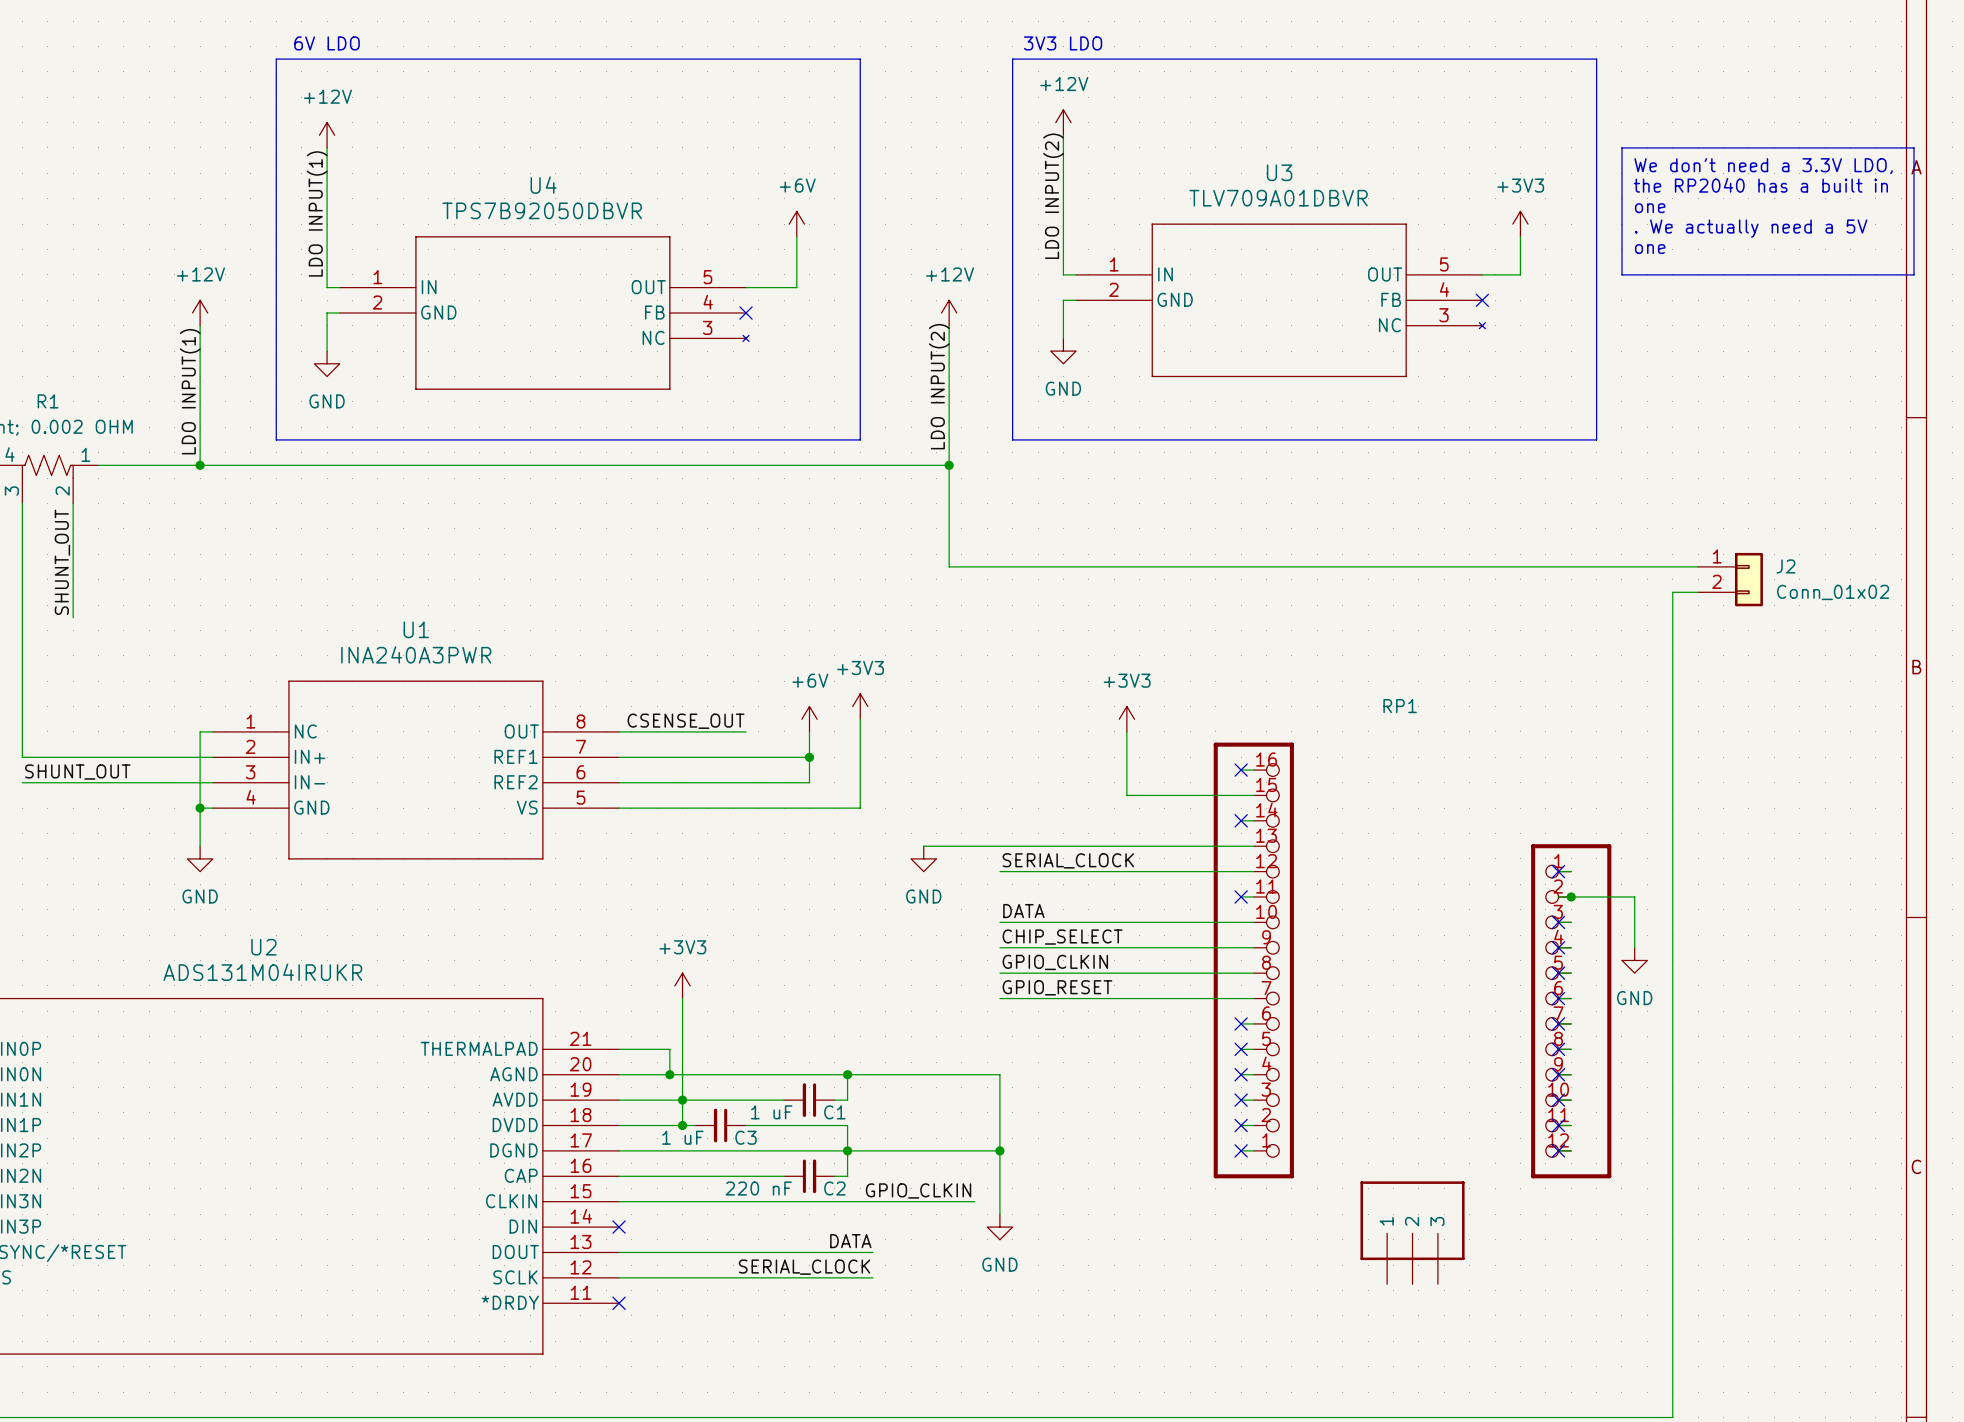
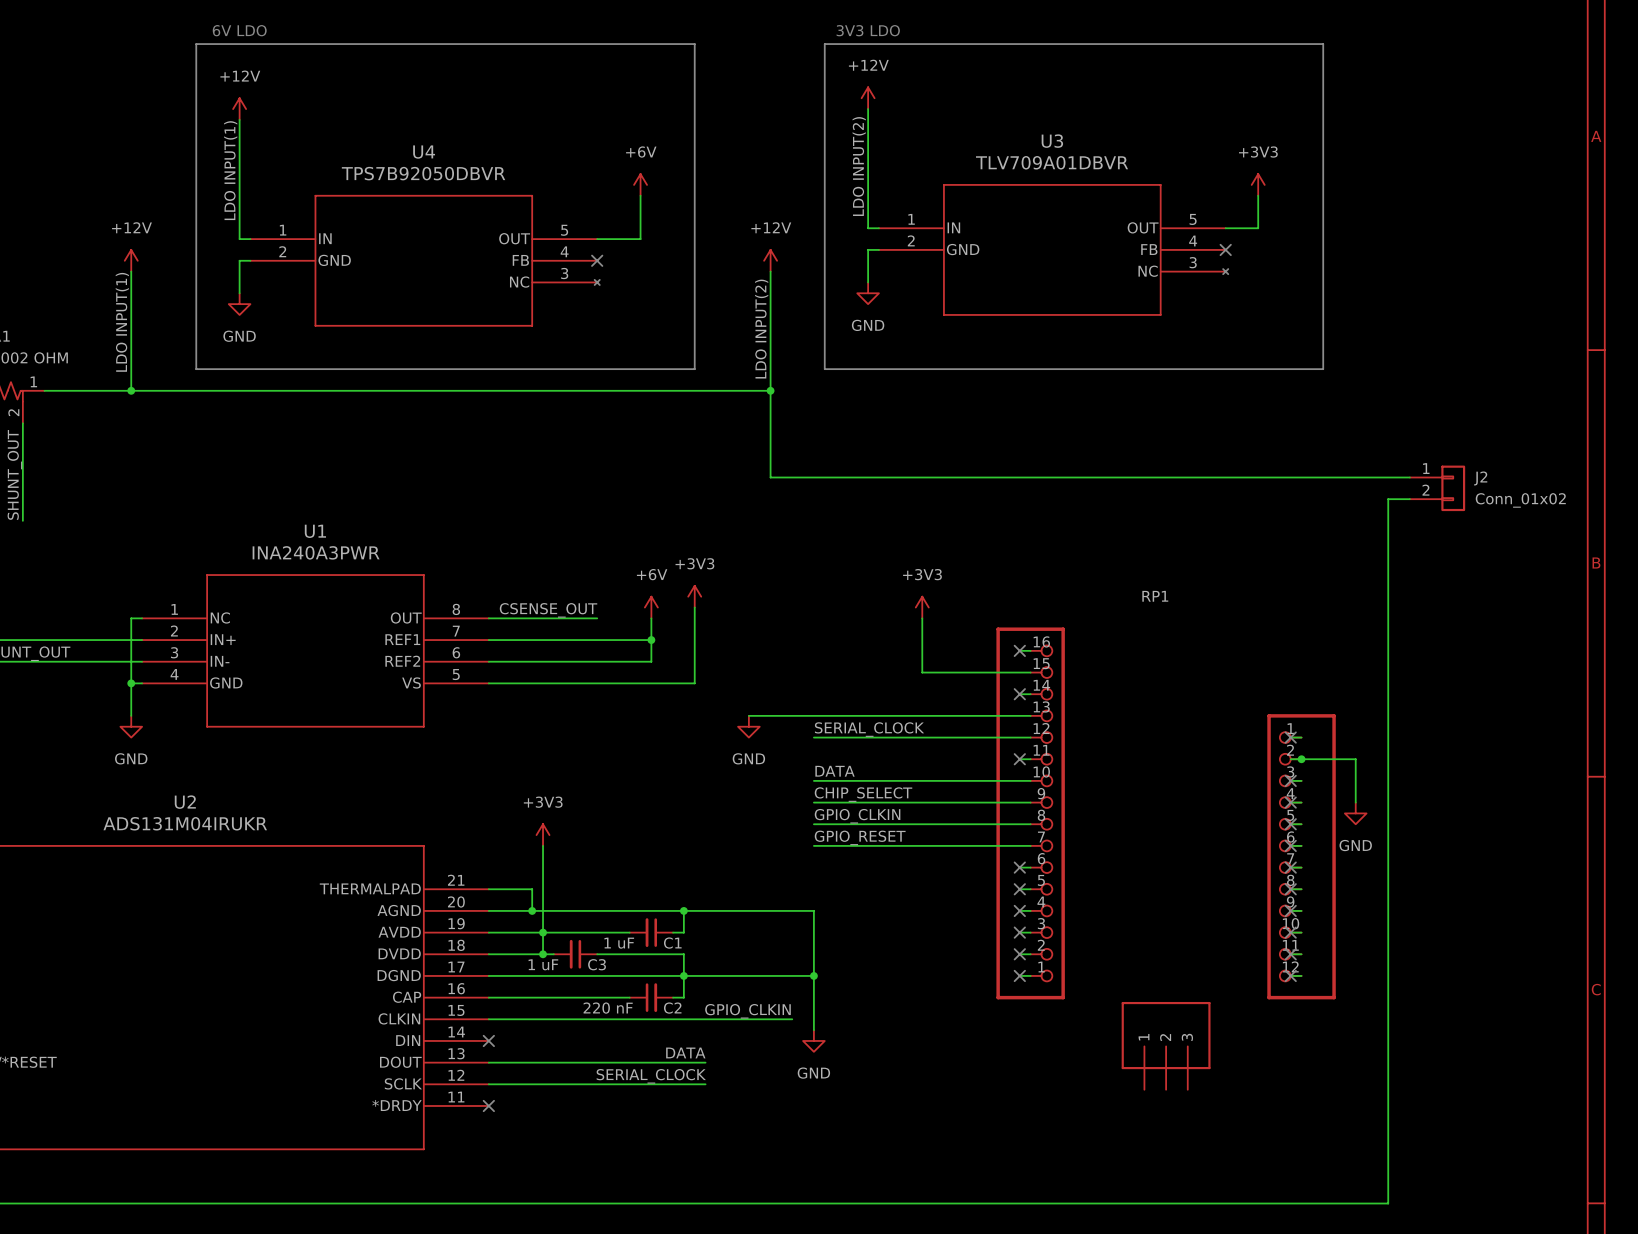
line: (1621, 147) (1913, 147) (1913, 274) (1621, 274) (1621, 147) -> none
text: We don't need a 3.3V LDO, (1763, 166) -> none
text: the RP2040 has a built in (1760, 185) -> none
text: one (1650, 208) -> none
text: . We actually need a 5V (1751, 228) -> none
text: one (1650, 249) -> none

